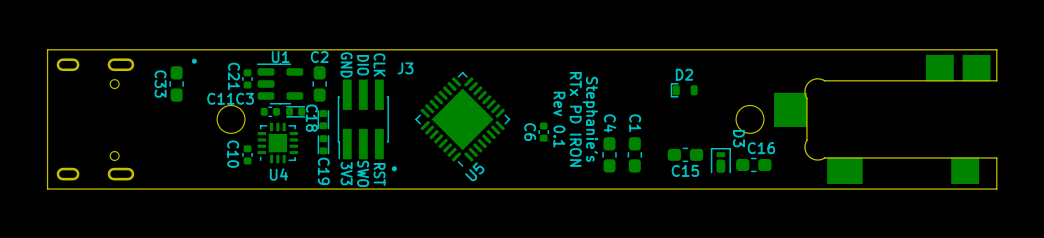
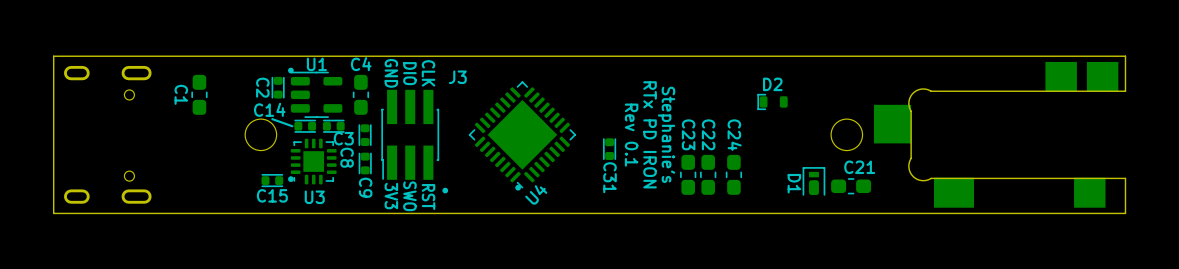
C2 name: C2 (319, 57) -> C4 (361, 64)
drawing: [191, 58, 197, 64] -> none
drawing: none -> [288, 67, 294, 74]
C2: none -> (278, 87)
C21: (247, 78) -> none
C33 name: C33 (160, 83) -> C1 (181, 94)
C3 name position: C3 (244, 98) -> C3 (343, 138)
line: none -> (272, 119) (292, 126)
C11: (270, 111) -> none
C14: none -> (305, 126)
C18 name: C18 (311, 118) -> C8 (347, 157)
C4 name: C4 (610, 123) -> C23 (688, 134)
C31: none -> (609, 149)
C6: (543, 132) -> none
D3 name: D3 (738, 138) -> D1 (794, 183)
C15 footprint: [667, 147, 704, 163] -> [261, 173, 284, 188]
C16 name: C16 (761, 148) -> C21 (859, 167)
C10: (247, 154) -> none
C22: none -> (708, 174)
C1: (634, 154) -> none
C24: none -> (733, 174)
drawing: none -> [288, 176, 294, 182]
drawing: none -> [515, 184, 521, 191]
C19 name: C19 (323, 171) -> C9 (365, 187)
U5 name: U5 (474, 171) -> U4 (536, 194)
U4 name: U4 (279, 174) -> U3 (314, 197)

